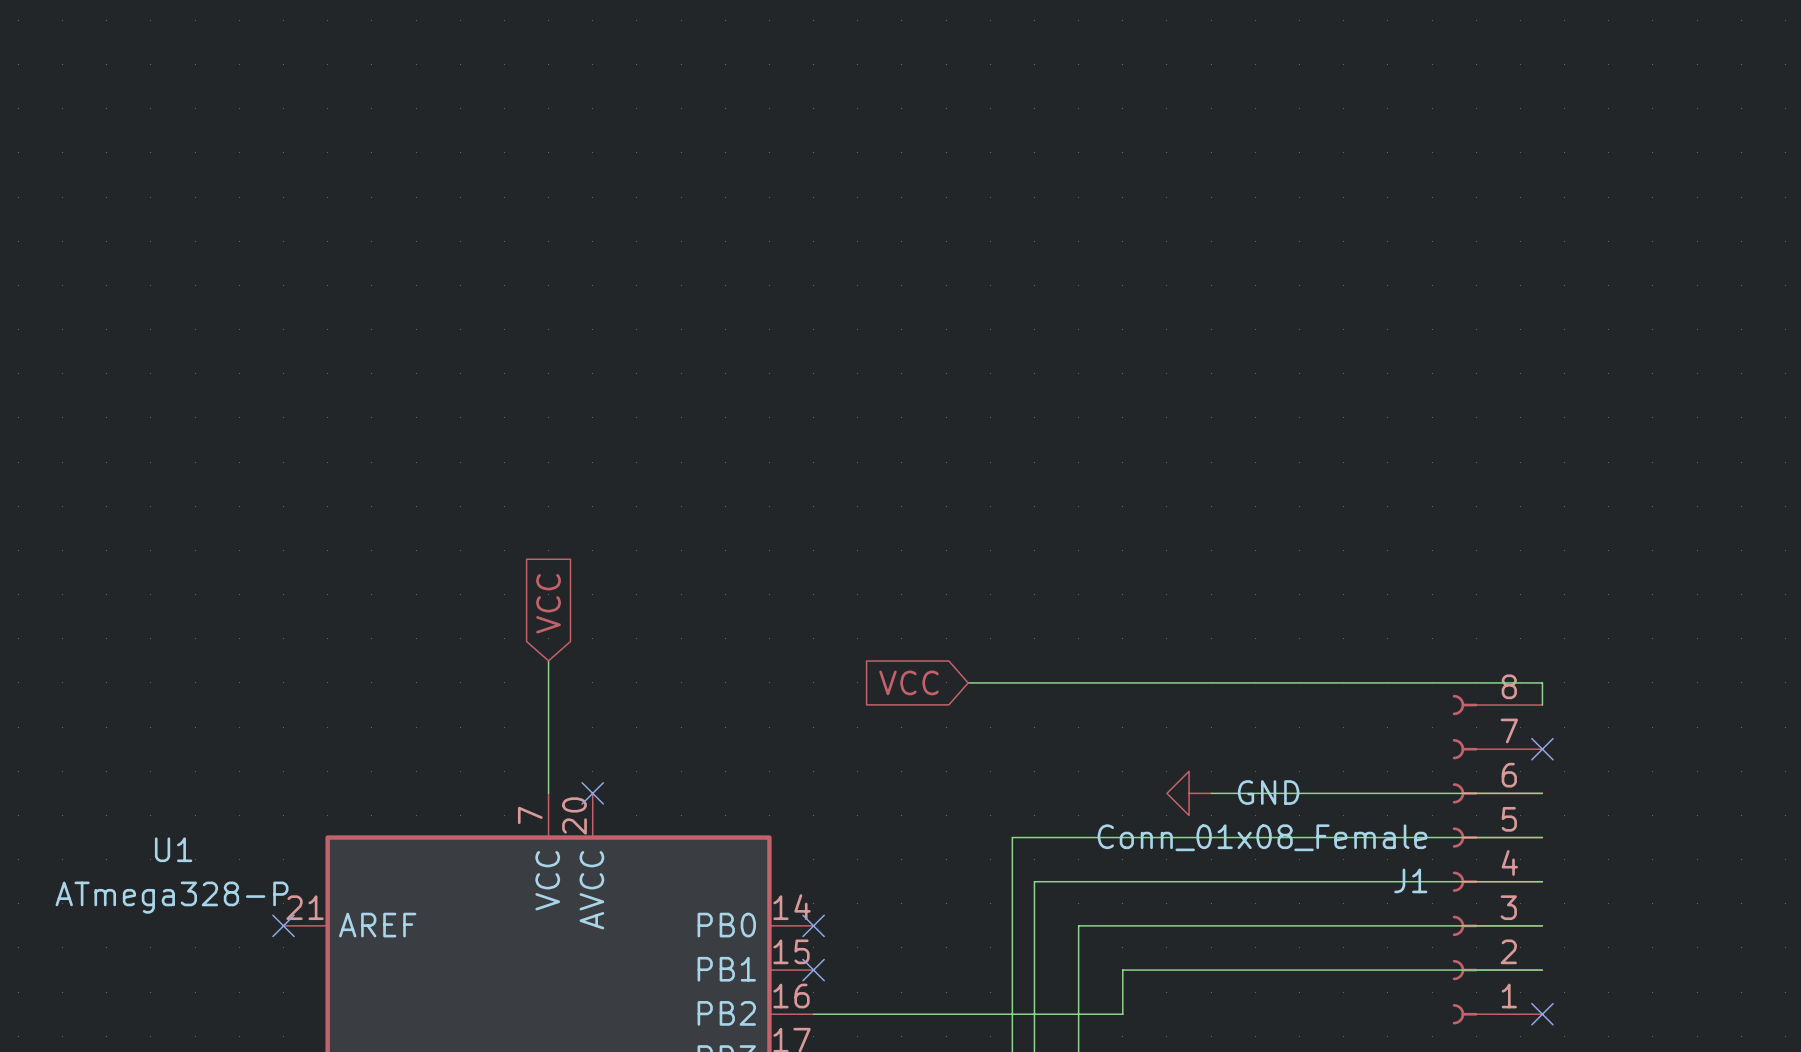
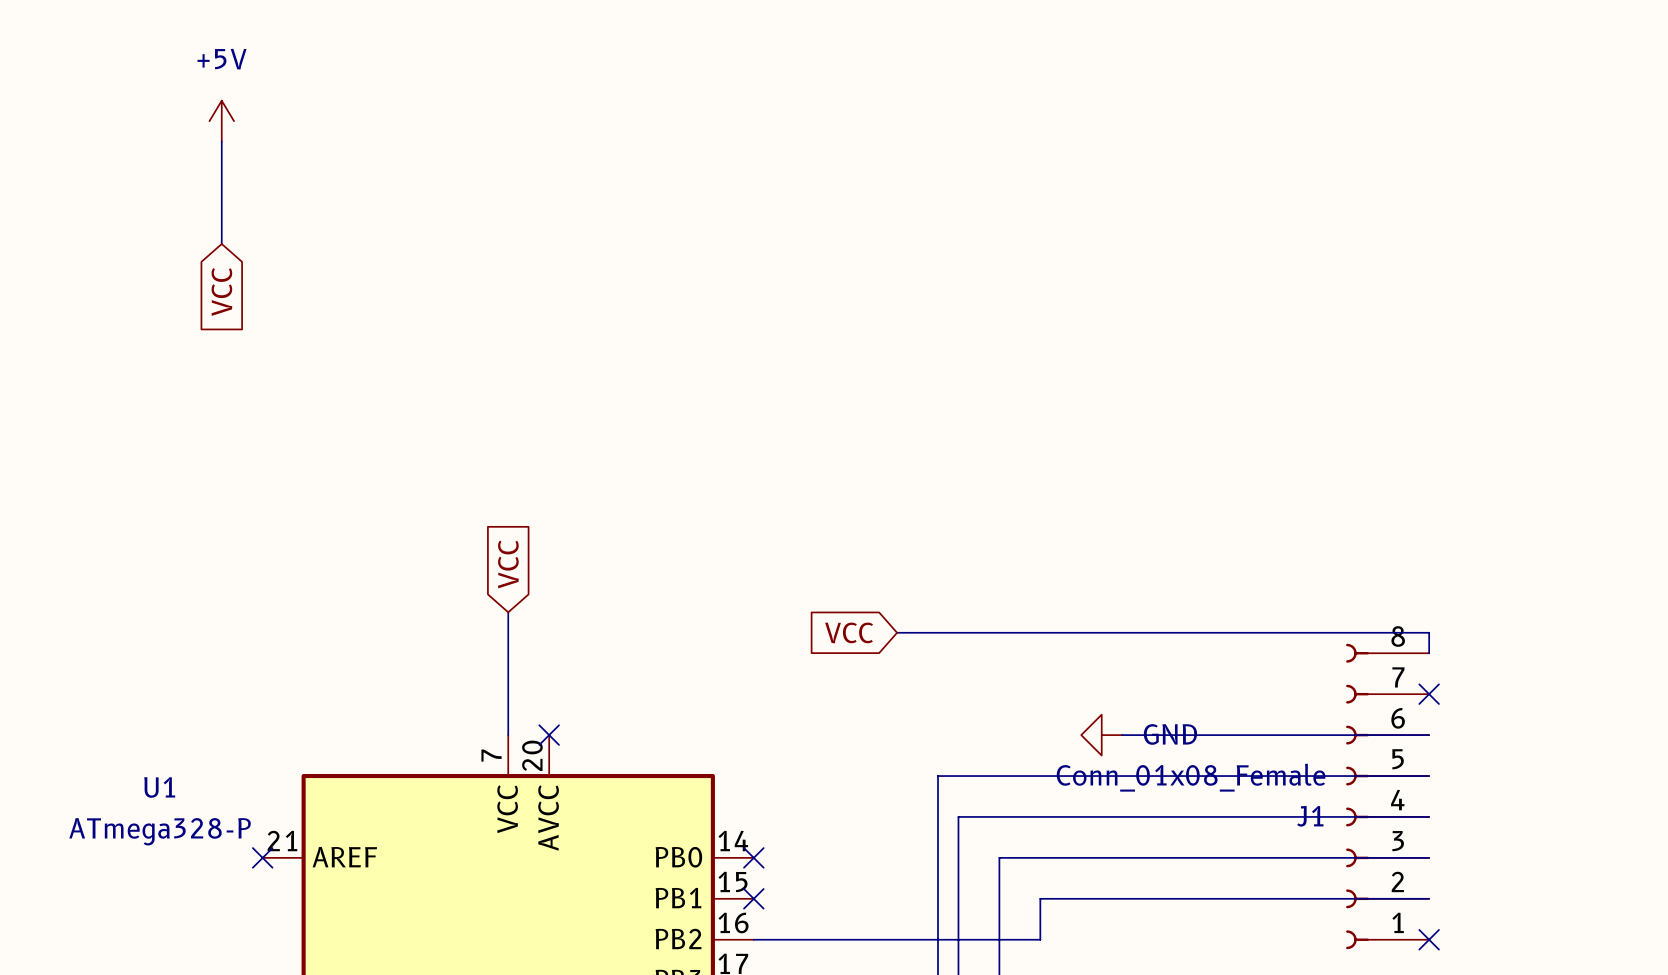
power symbol: none -> +5V (221, 121)
wire: none -> (221, 141) (221, 243)
global label: none -> VCC (221, 291)

